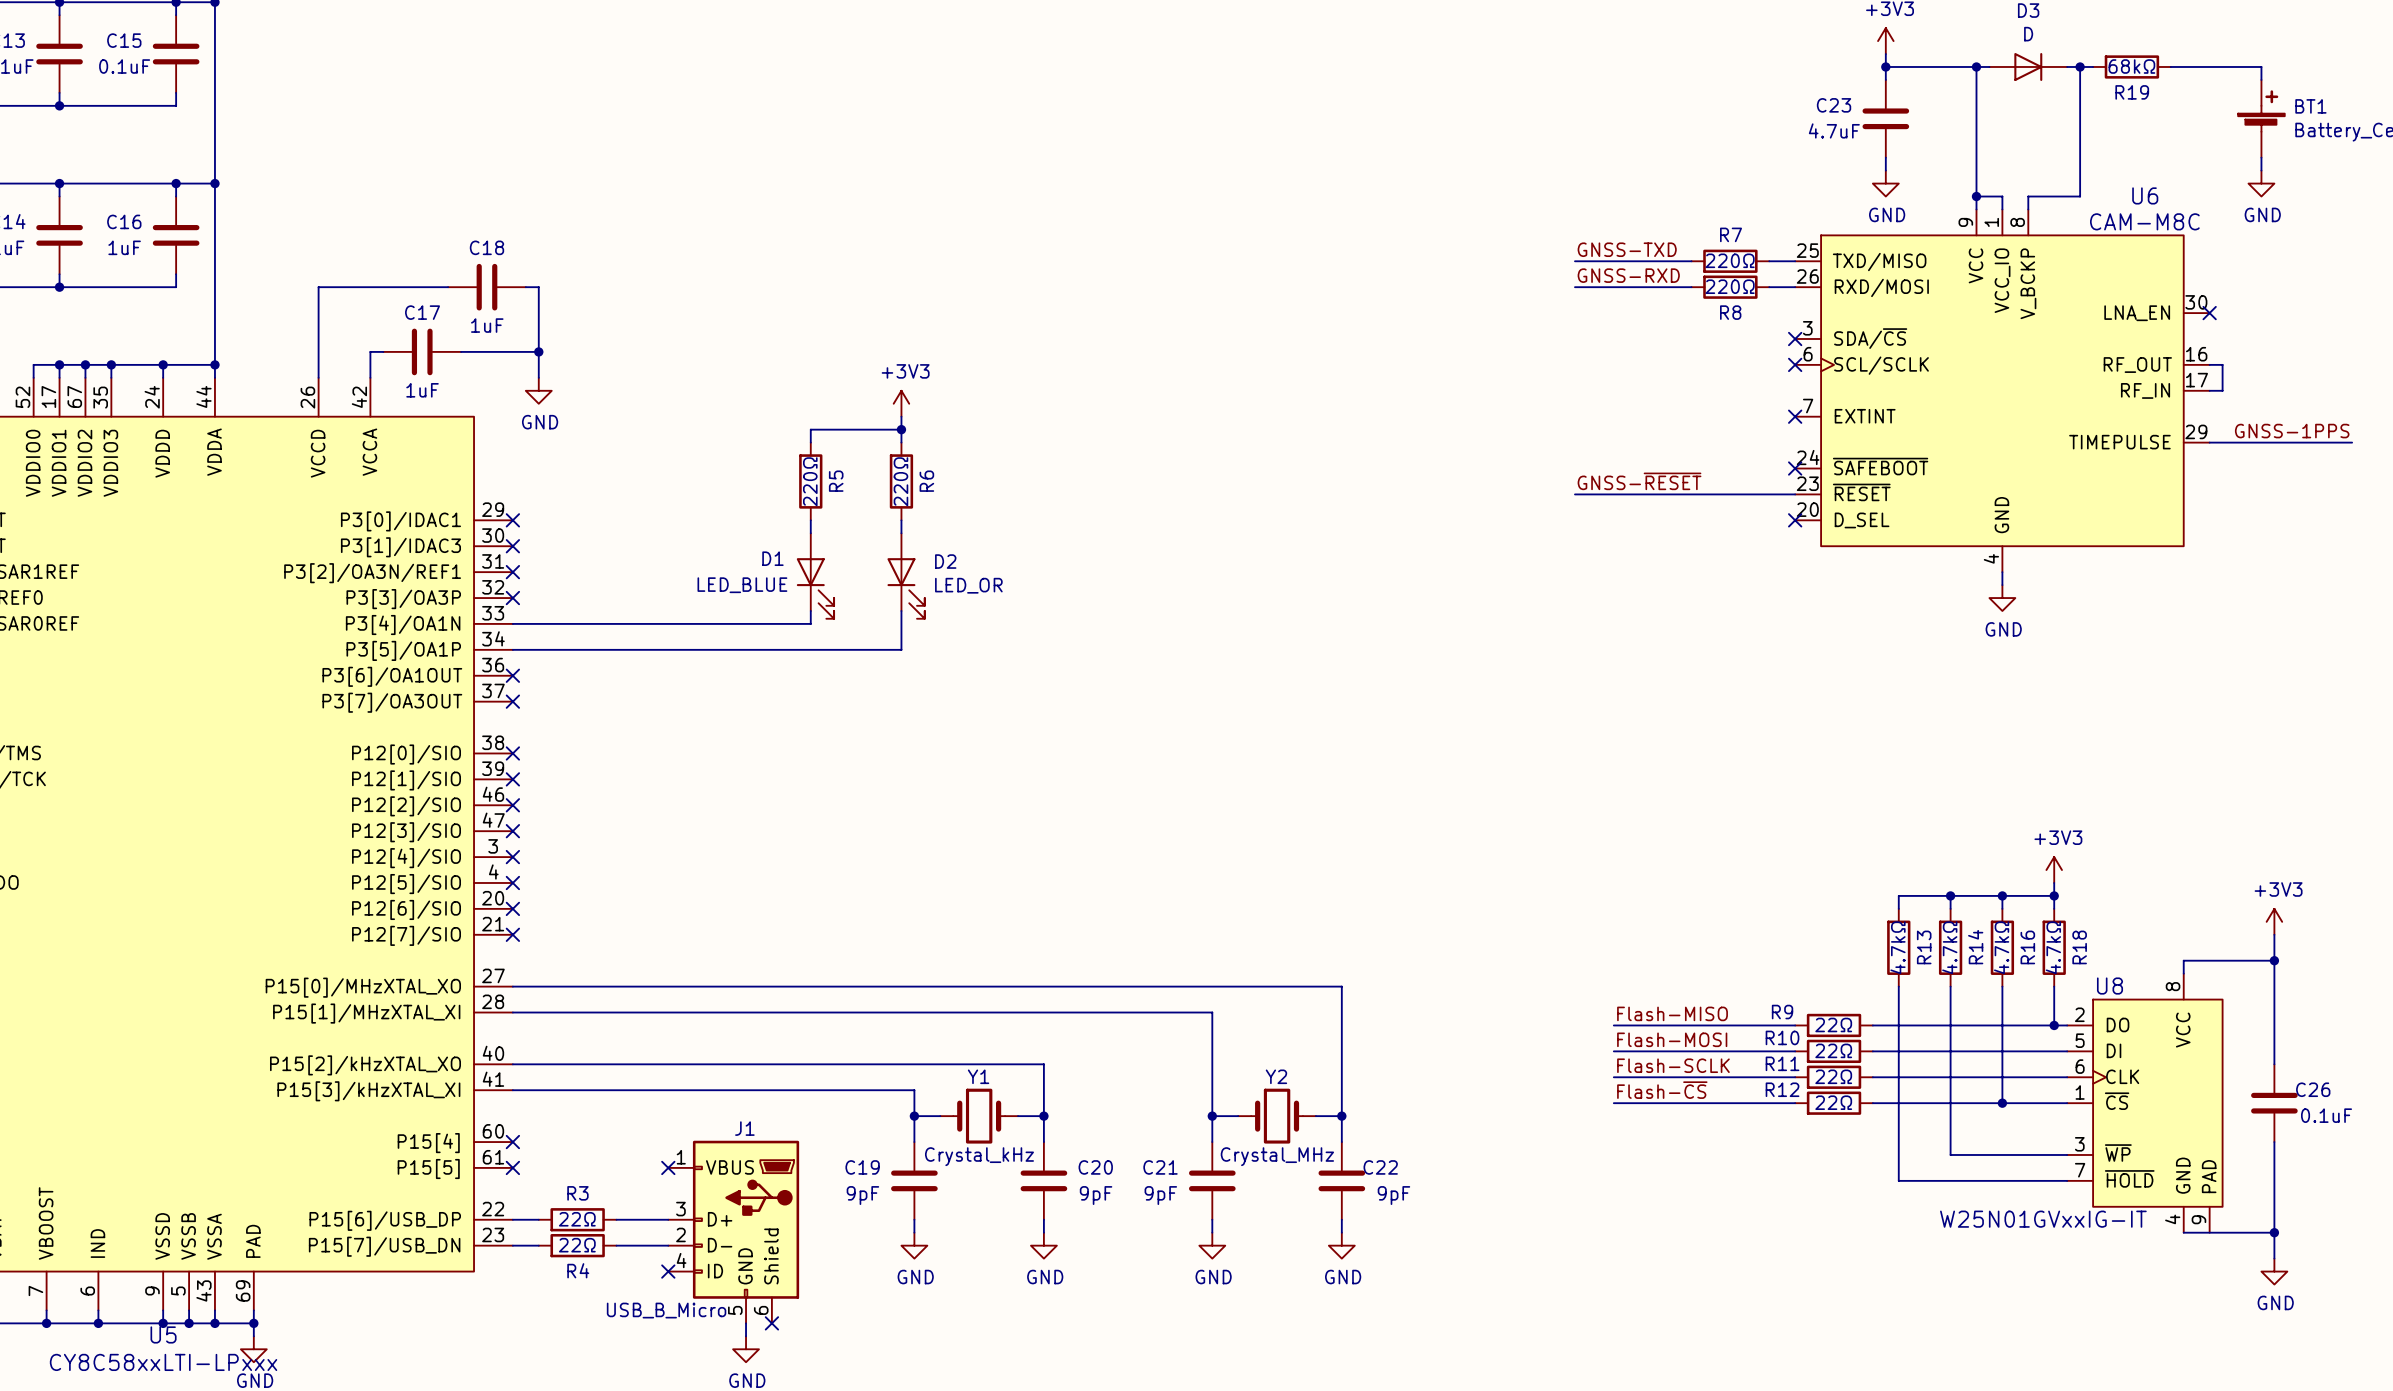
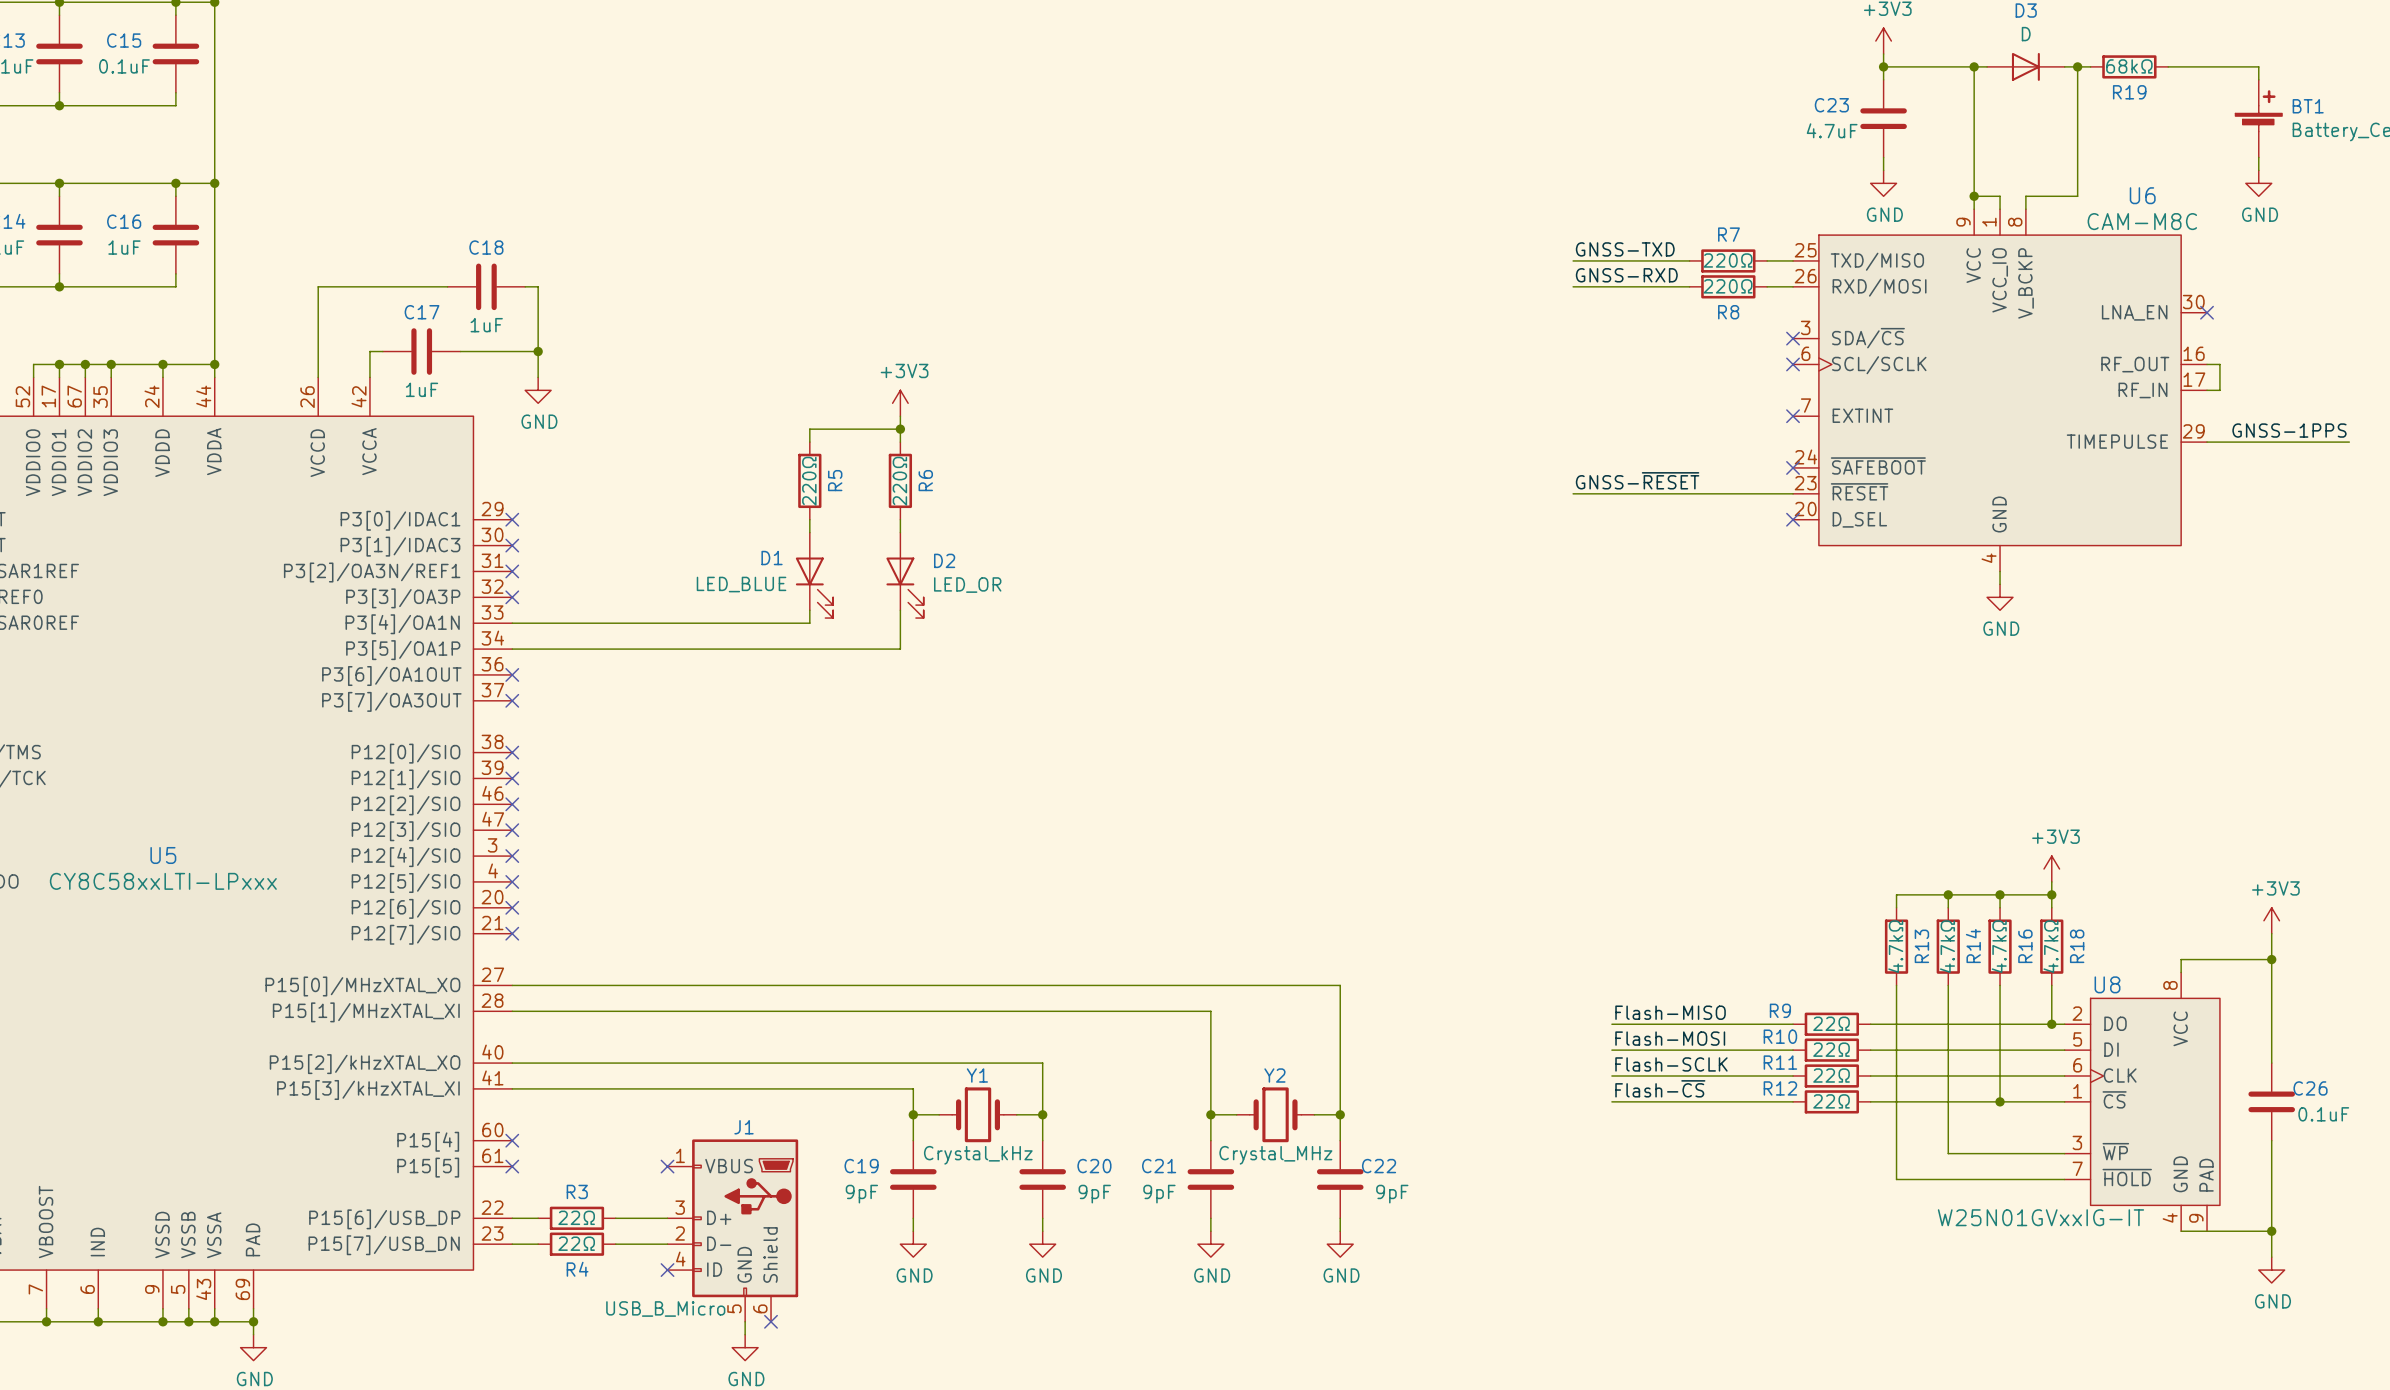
U5 name position: U5 (163, 1334) -> U5 (163, 855)
U5 value position: CY8C58xxLTI-LPxxx (163, 1362) -> CY8C58xxLTI-LPxxx (163, 881)

